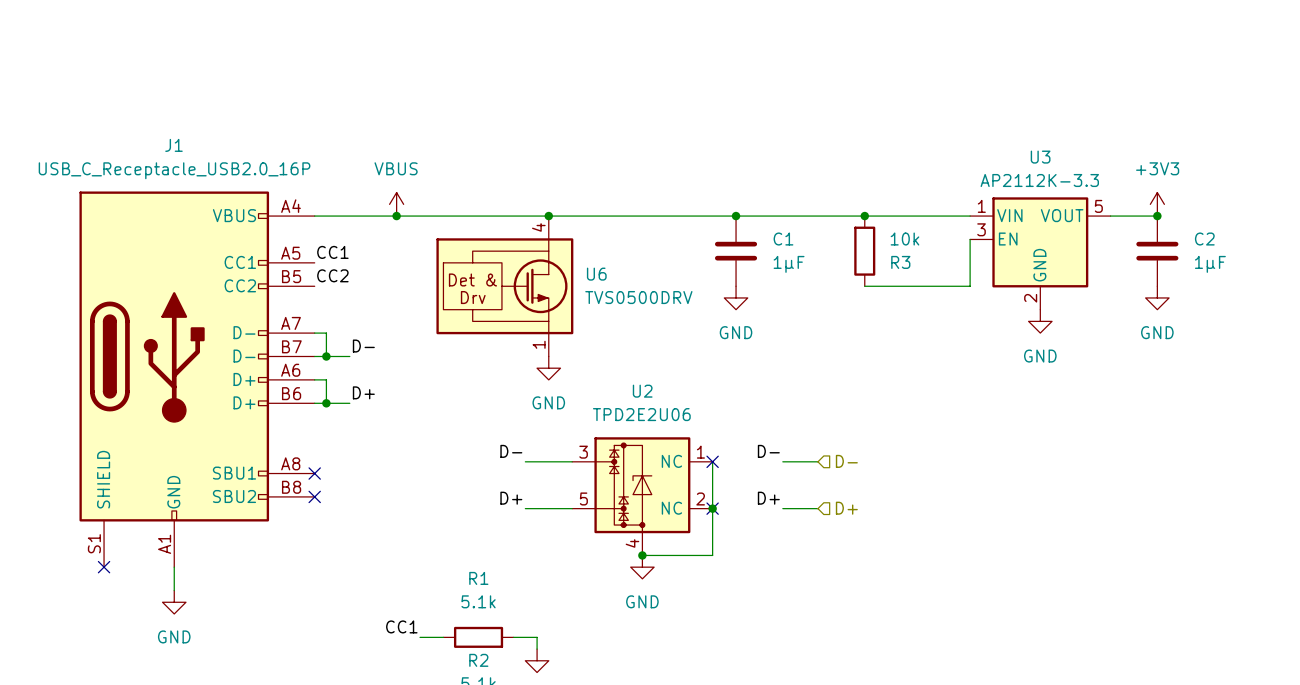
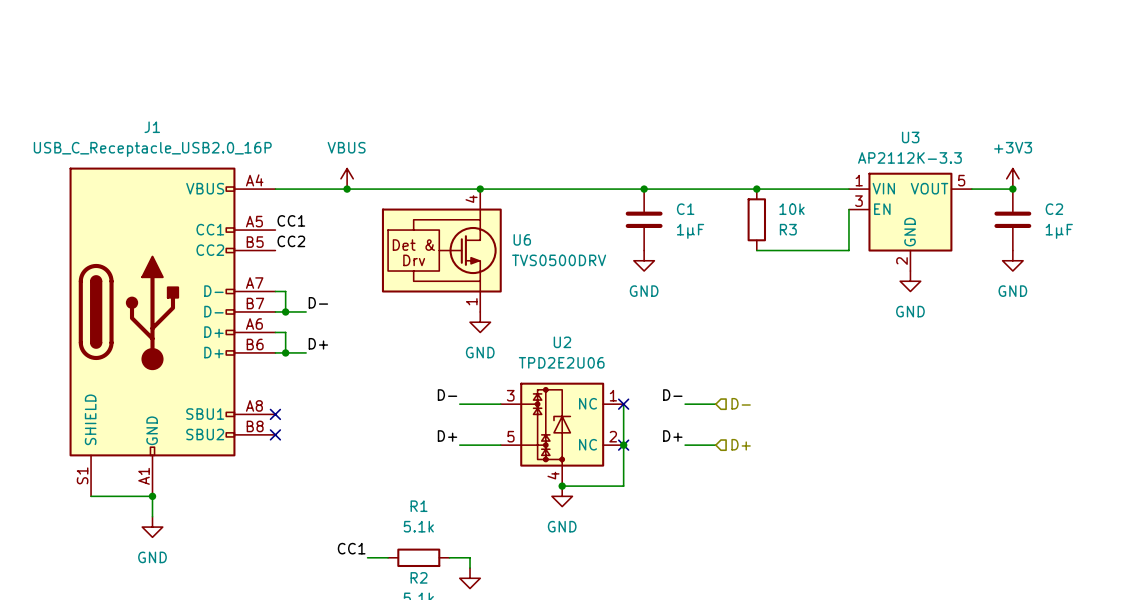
wire: none -> (91, 496) (152, 496)
no-connect mark: (104, 567) -> none
junction: none -> (152, 496)

